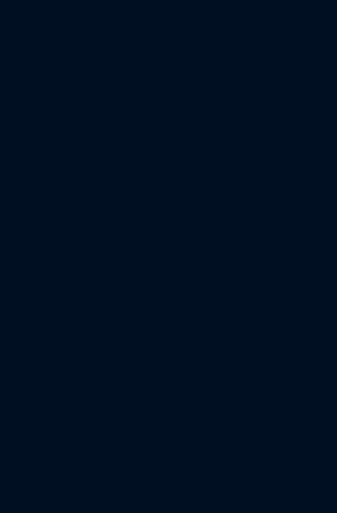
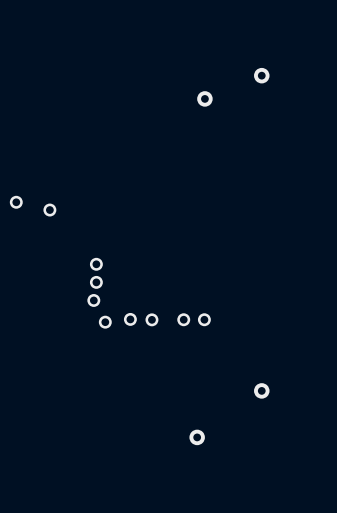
via: none -> (261, 75)
via: none -> (204, 98)
via: none -> (16, 202)
via: none -> (49, 210)
via: none -> (96, 264)
via: none -> (96, 282)
via: none -> (93, 300)
via: none -> (130, 319)
via: none -> (151, 319)
via: none -> (183, 319)
via: none -> (204, 319)
via: none -> (105, 322)
via: none -> (261, 390)
via: none -> (197, 437)

